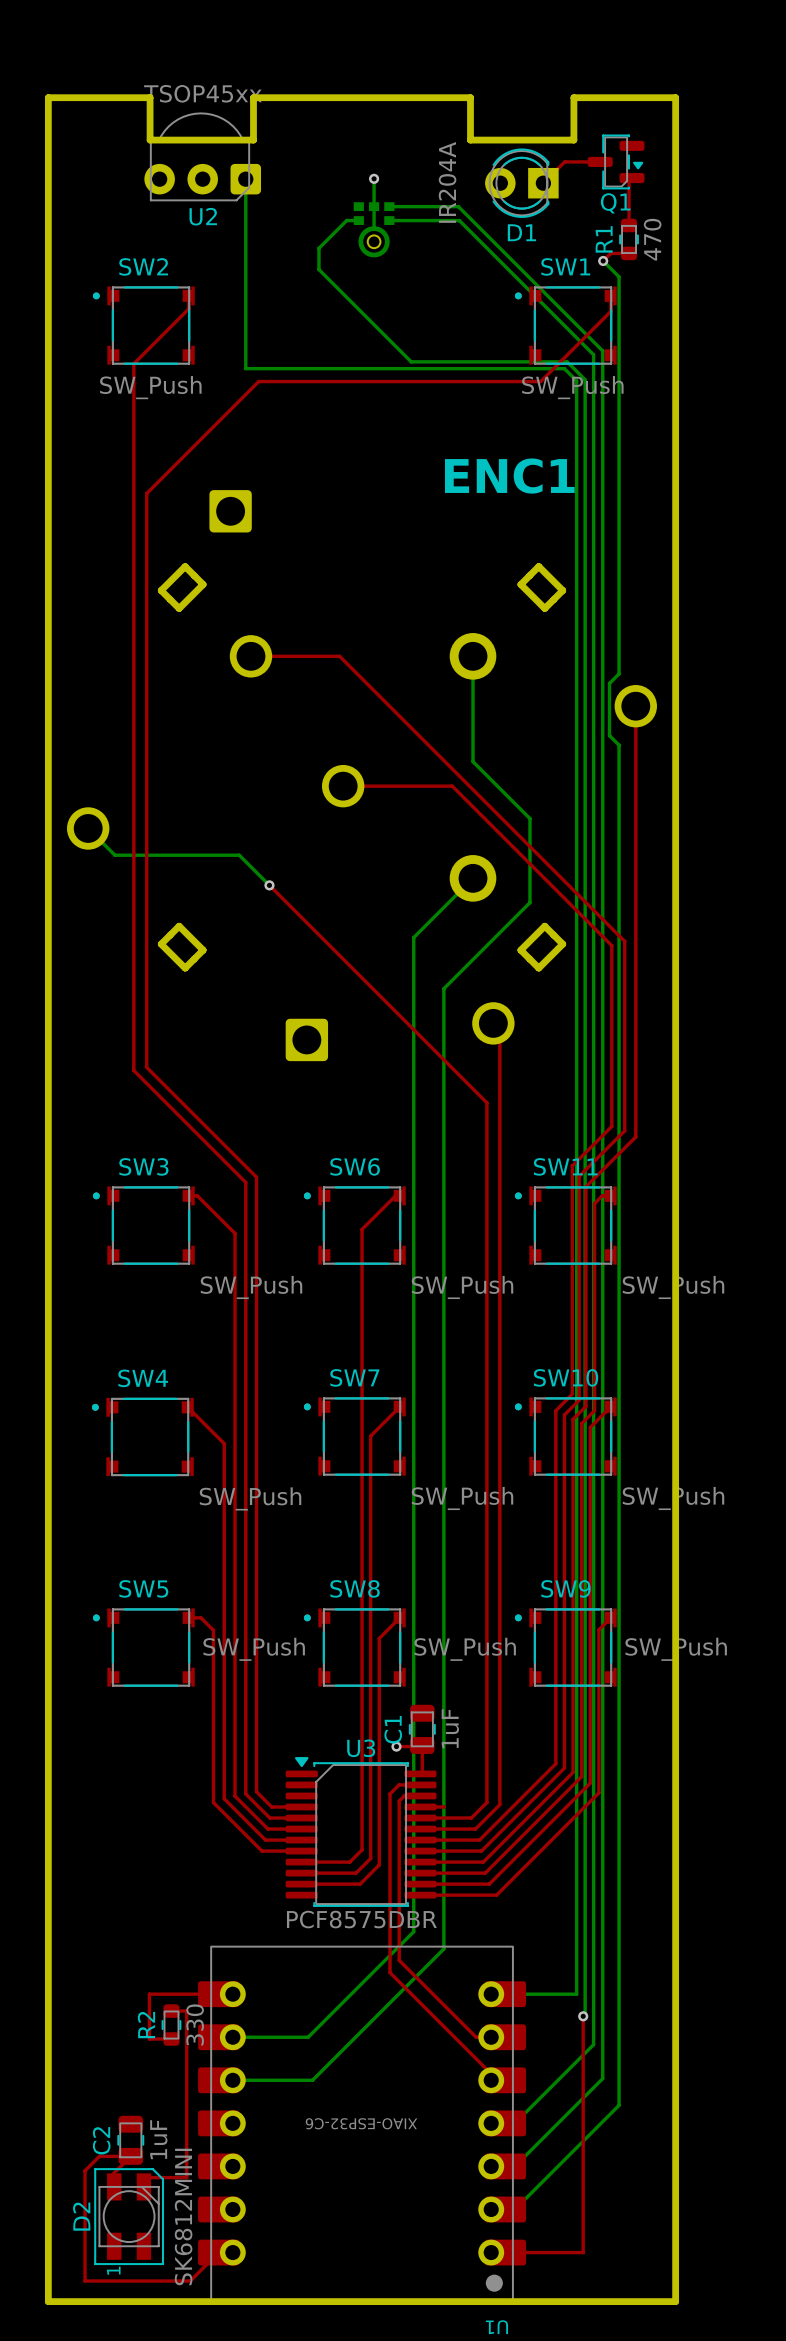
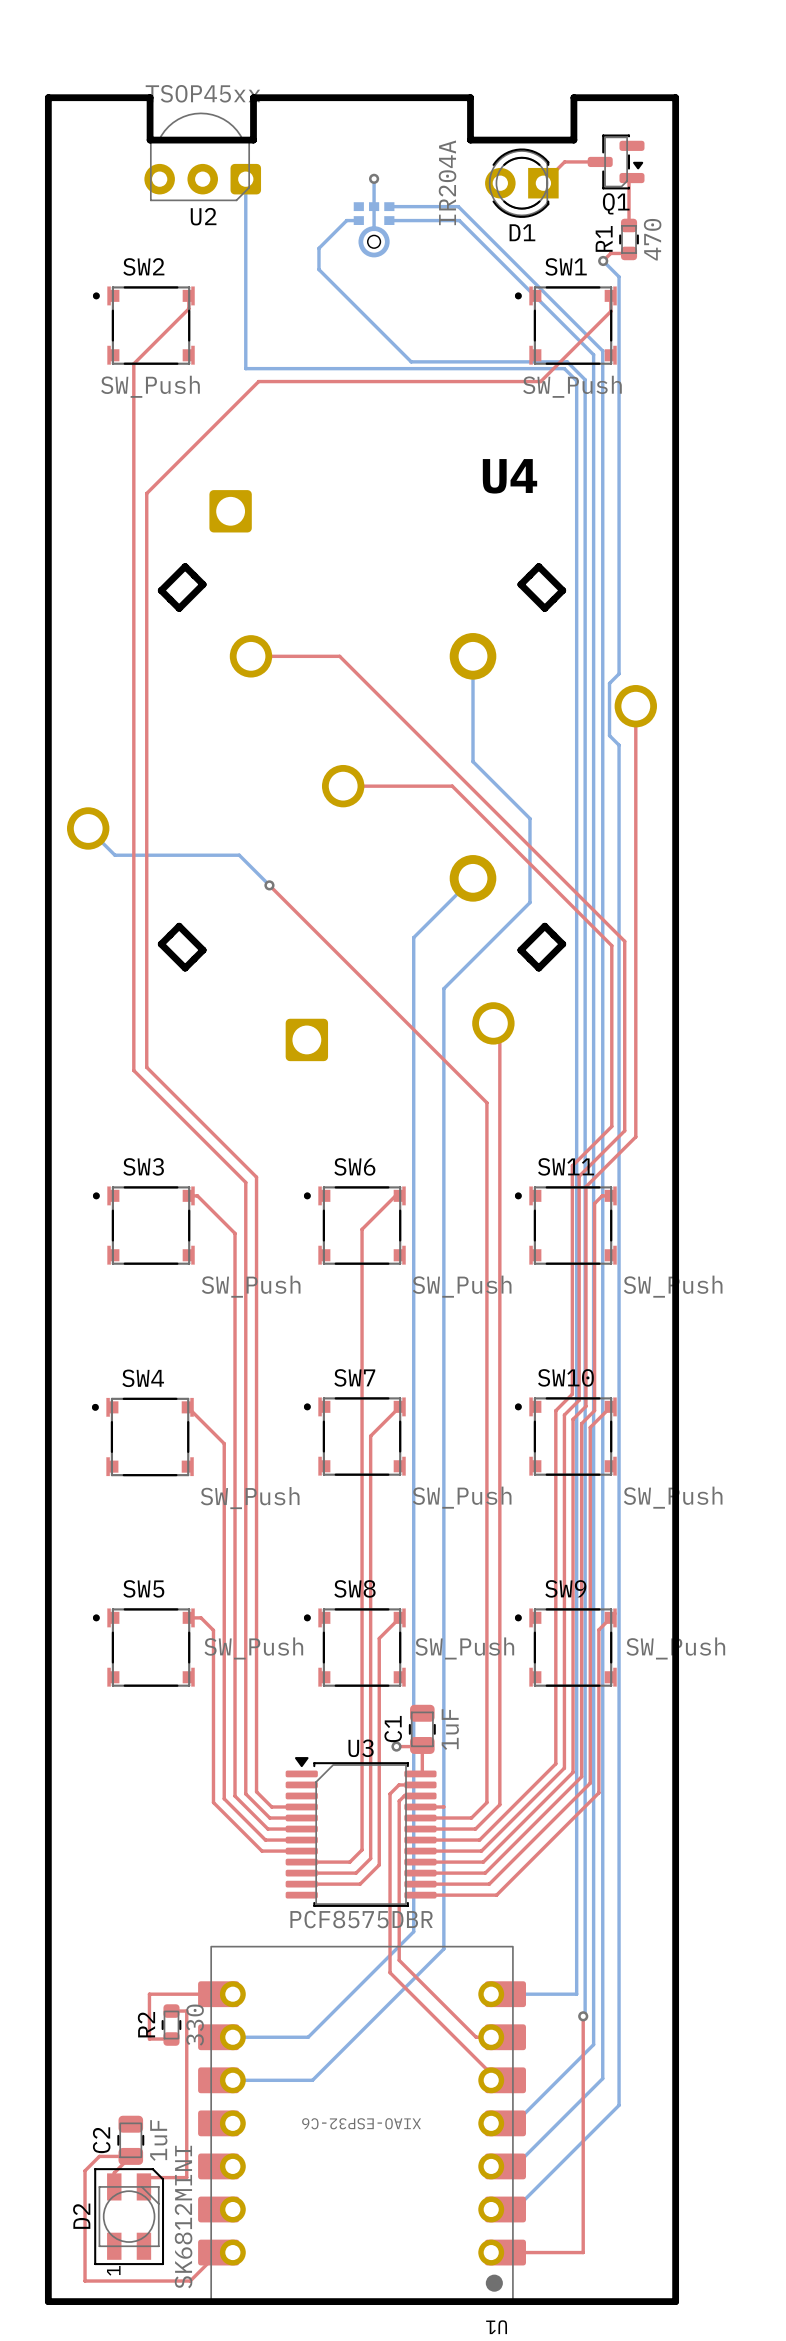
ENC1 name: ENC1 (509, 476) -> U4 (510, 476)

